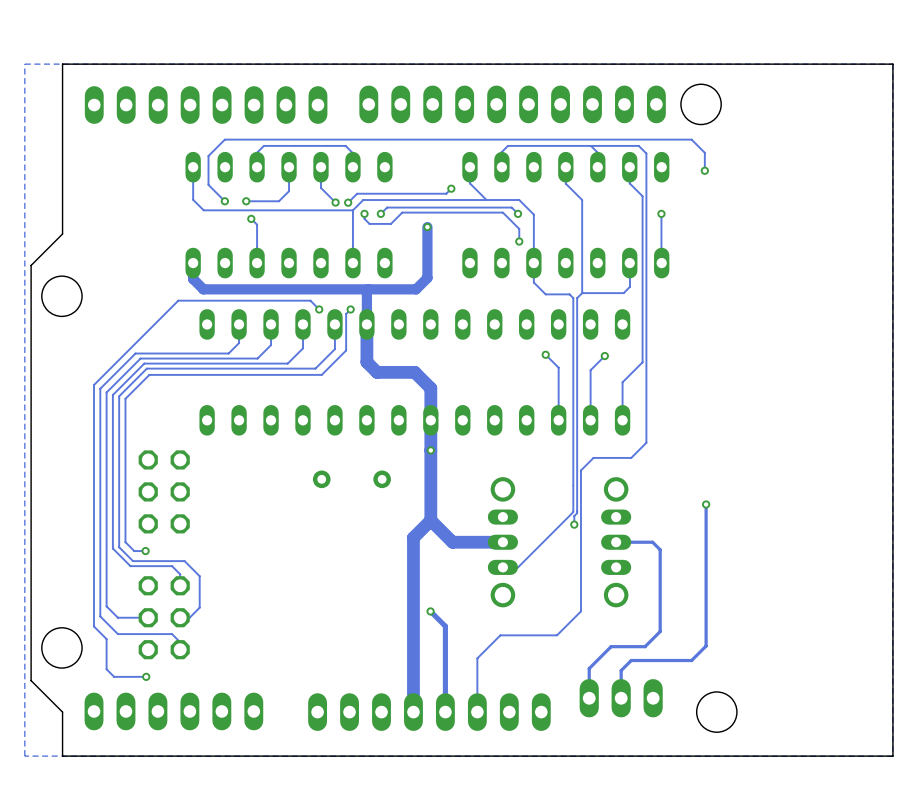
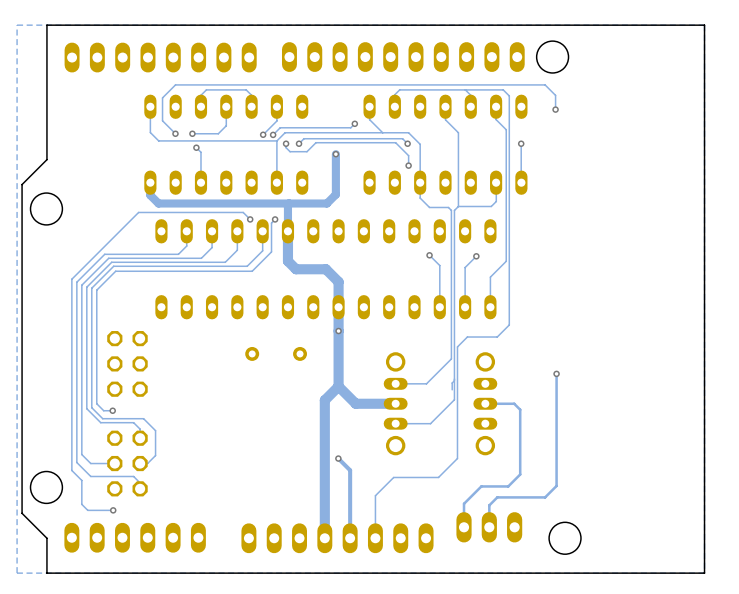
track: (314, 145) (345, 145) (352, 153) (352, 167) -> (246, 89) (251, 95) (251, 106)
track: (320, 167) (320, 187) (335, 202) -> (276, 106) (276, 121) (263, 134)
track: (573, 485) (573, 512) (518, 567) -> (454, 380) (454, 399) (430, 423) (407, 423)
track: none -> (451, 358) (426, 383) (395, 383)
via: (574, 524) -> none

